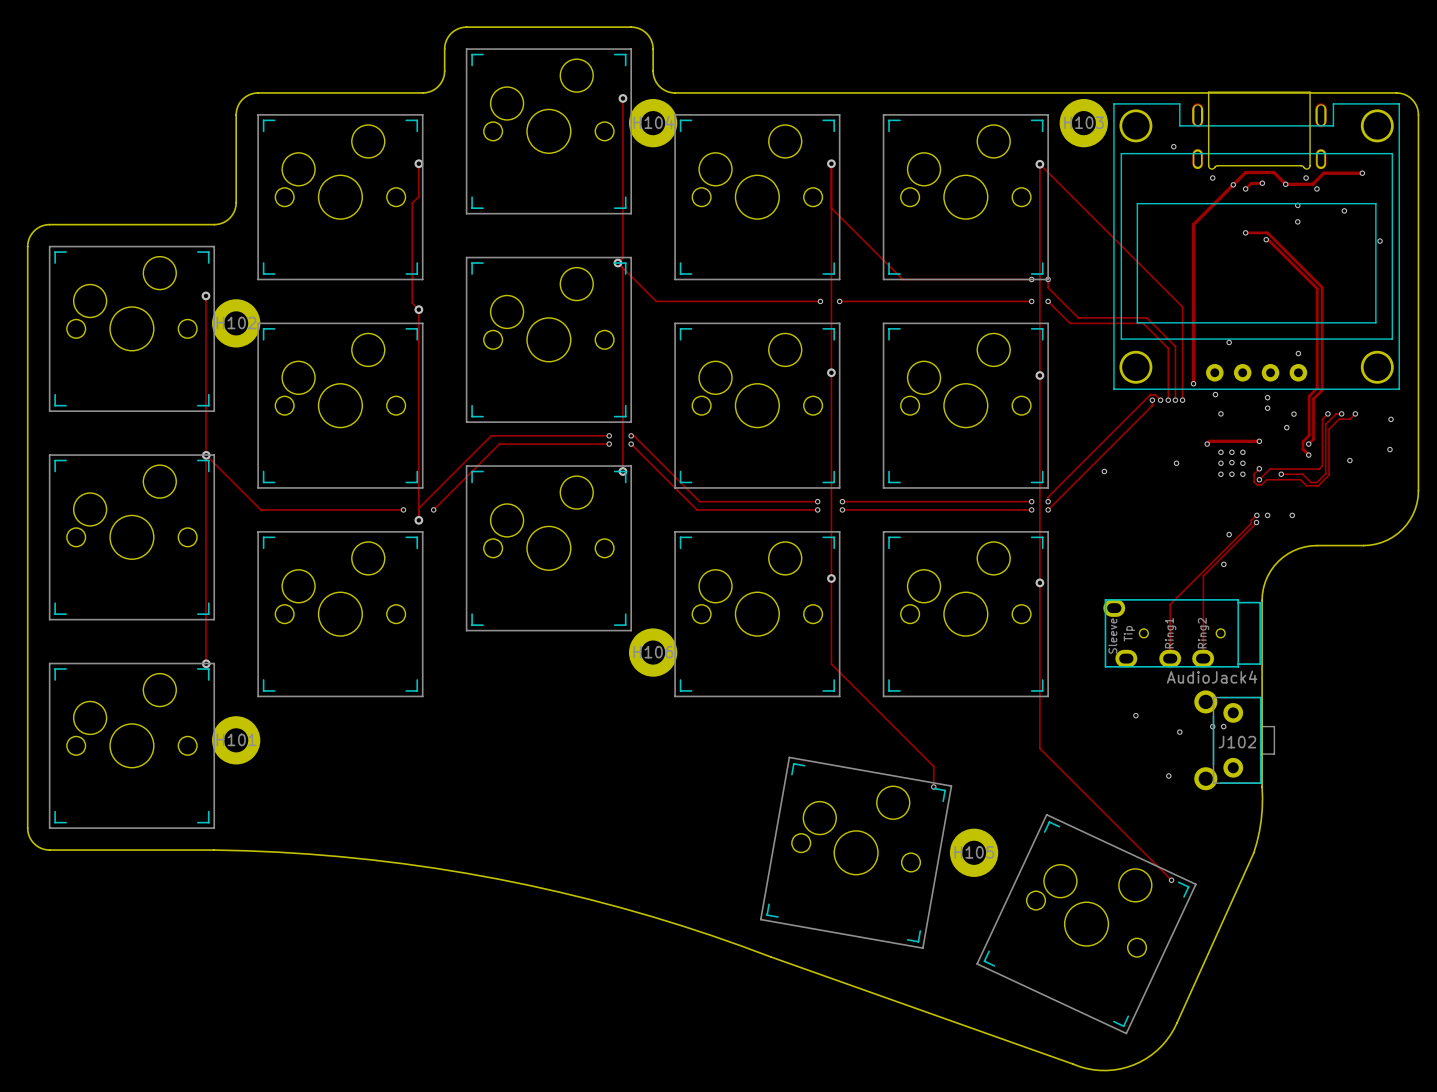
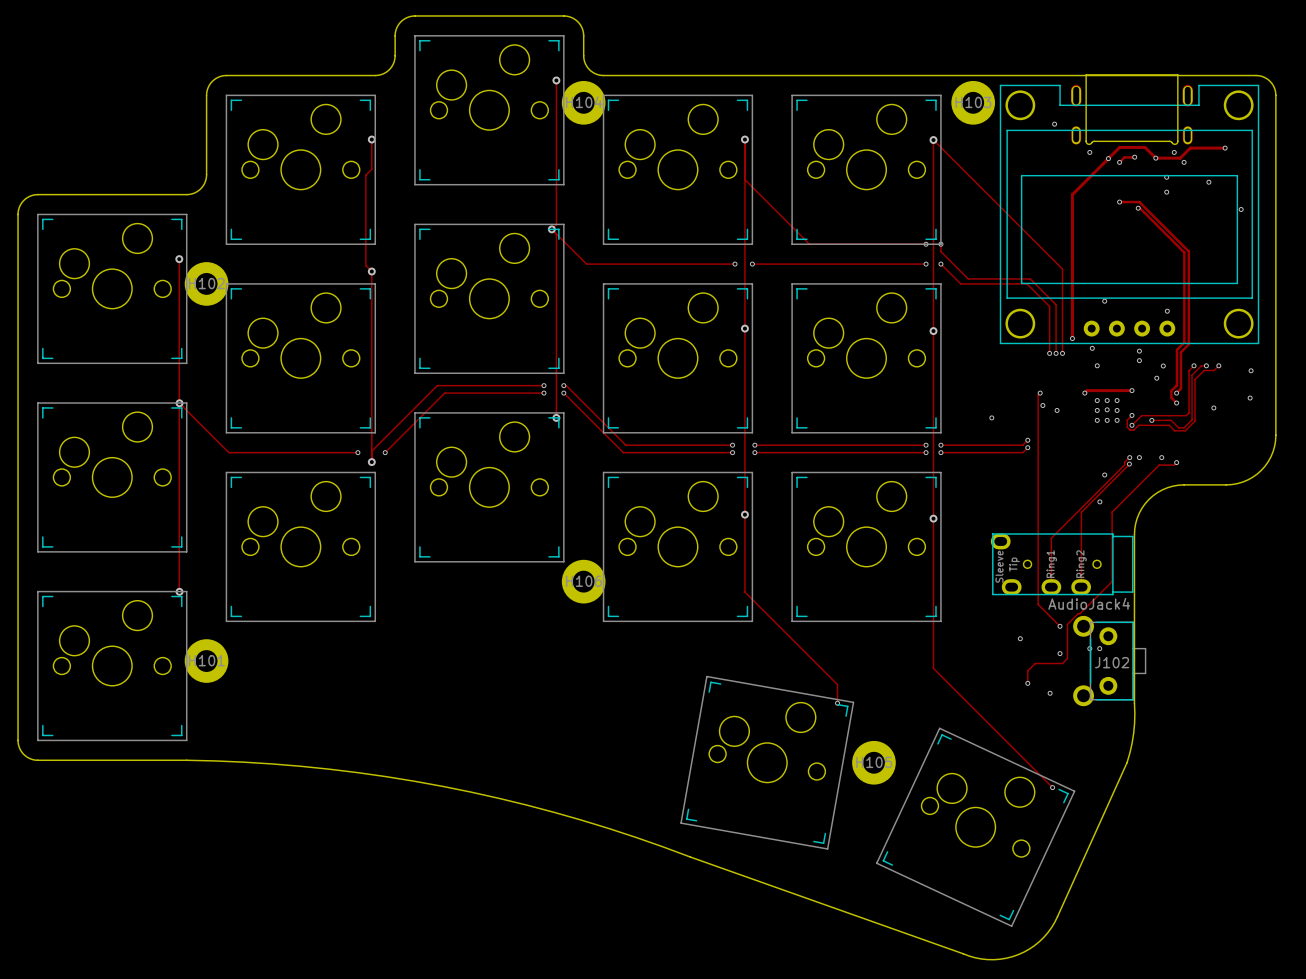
track: (1152, 400) (1152, 405) (1048, 509) -> (1027, 447) (1022, 452) (940, 452)
via: (1152, 400) -> none
track: (1160, 400) (1155, 394) (1150, 394) (1048, 497) (1048, 501) -> (1027, 440) (1022, 445) (940, 445)
via: (1160, 400) -> none
track: none -> (1040, 393) (1038, 395) (1038, 604) (1060, 626)
via: none -> (1040, 393)
via: none -> (1042, 405)
via: none -> (1027, 440)
via: none -> (1027, 447)
track: none -> (1176, 462) (1174, 465) (1159, 465) (1112, 512) (1112, 581) (1067, 624) (1067, 658) (1062, 663) (1035, 663) (1027, 670) (1027, 683)
via: none -> (1176, 462)
via: none -> (1060, 626)
via: none -> (1027, 683)

